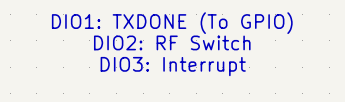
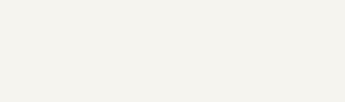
text: DIO1: TXDONE (To GPIO) (172, 23) -> none
text: DIO2: RF Switch (172, 42) -> none
text: DIO3: Interrupt (173, 66) -> none

